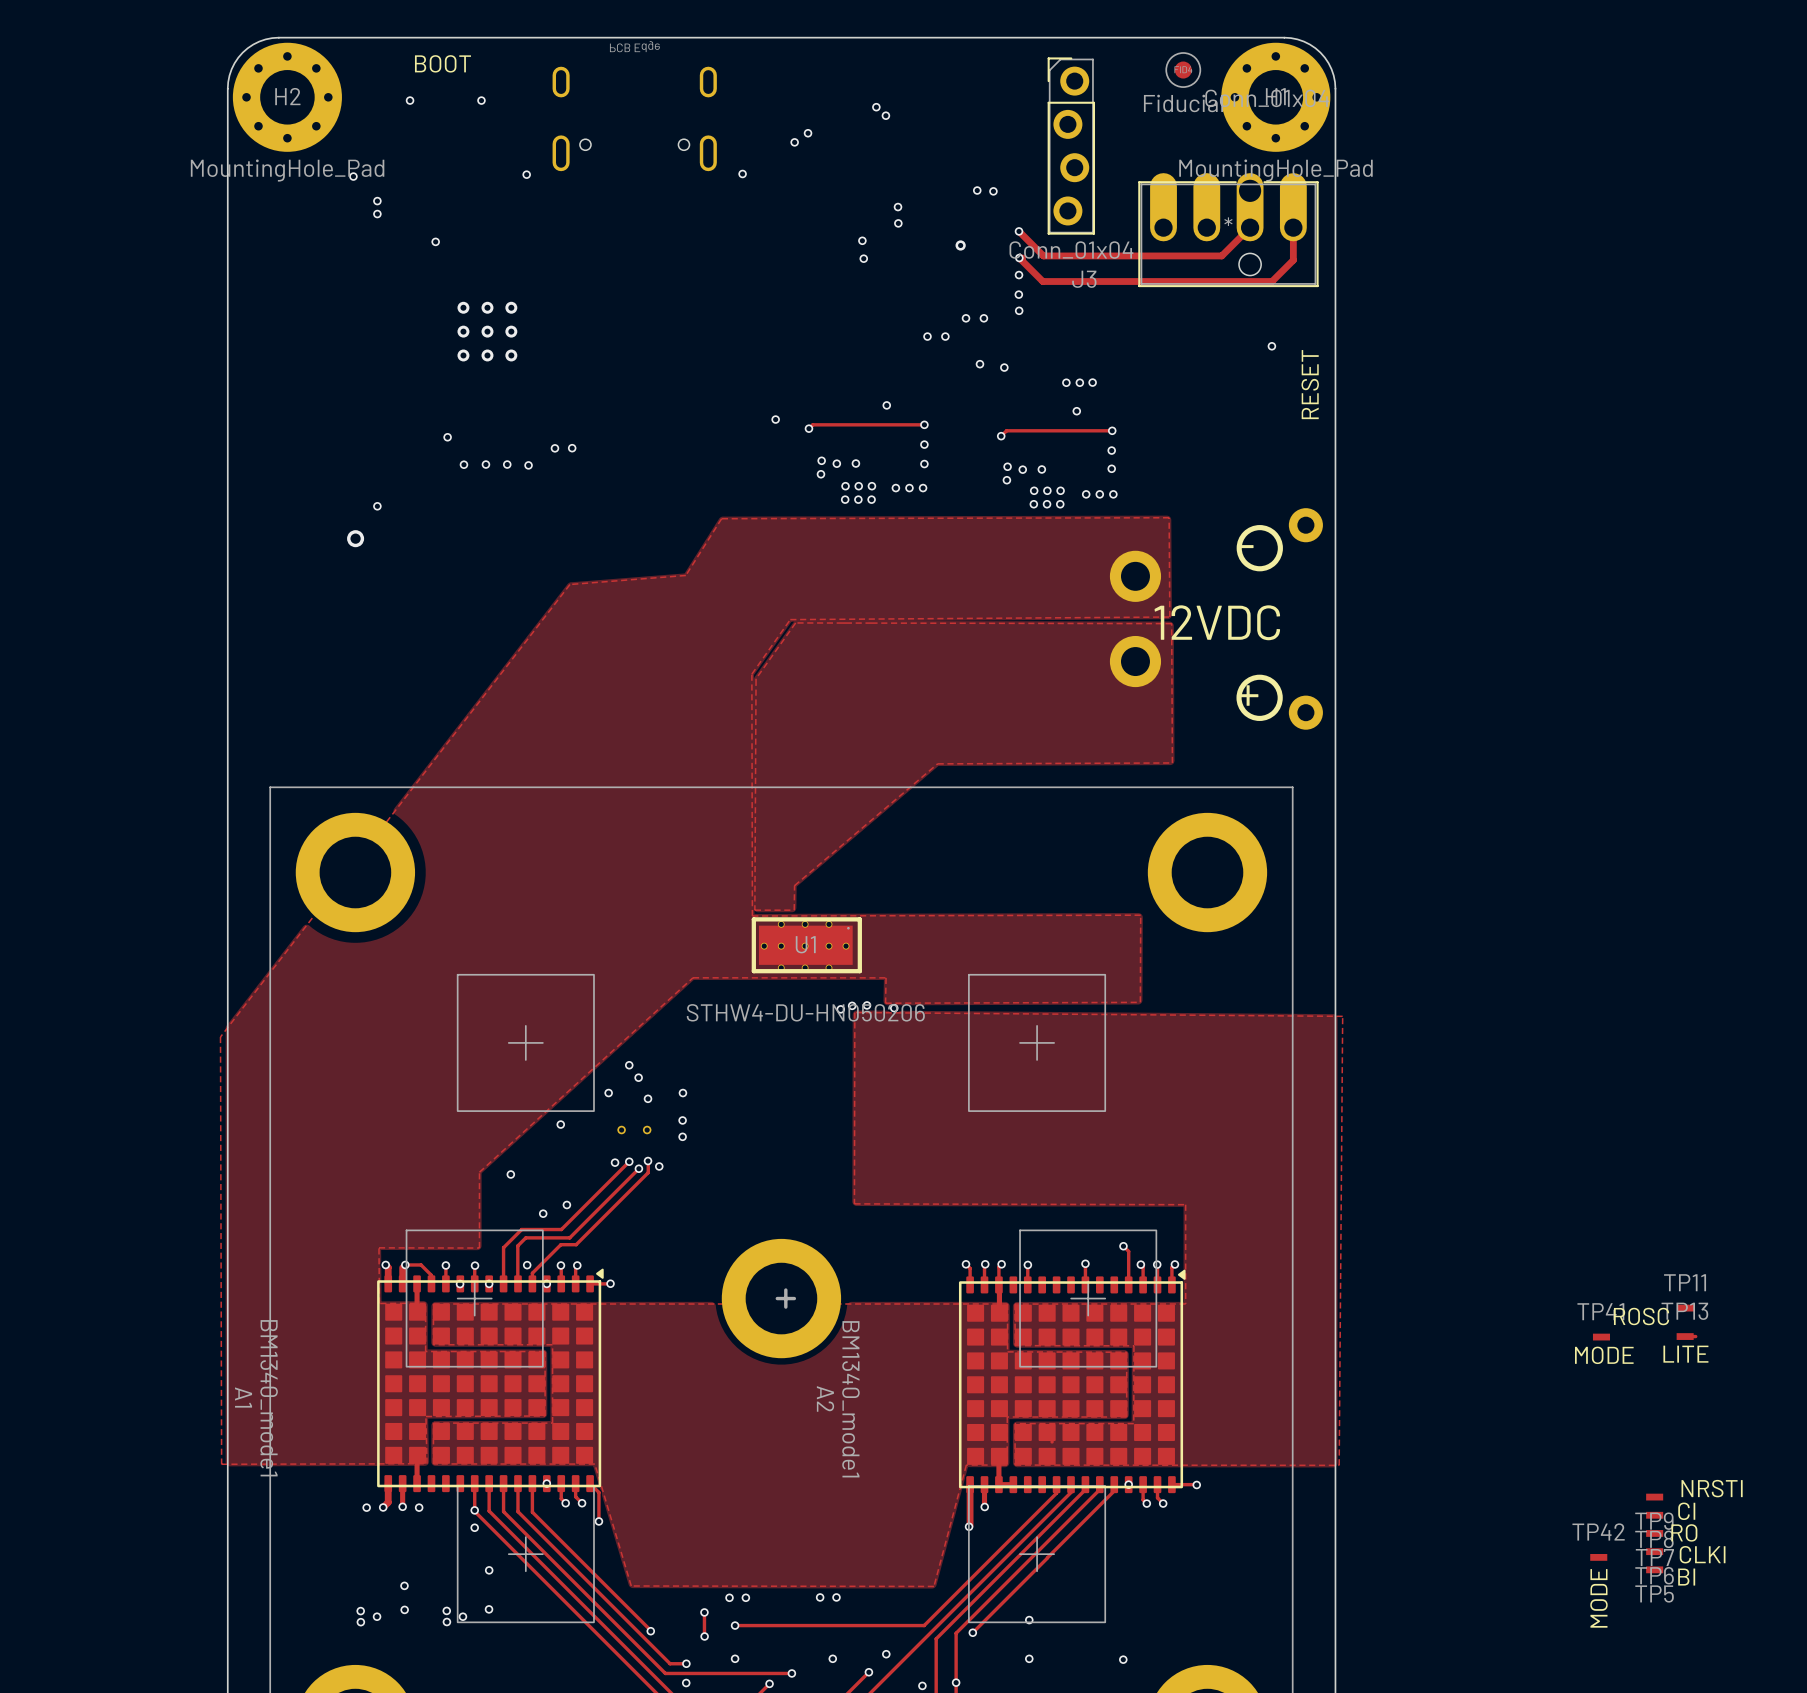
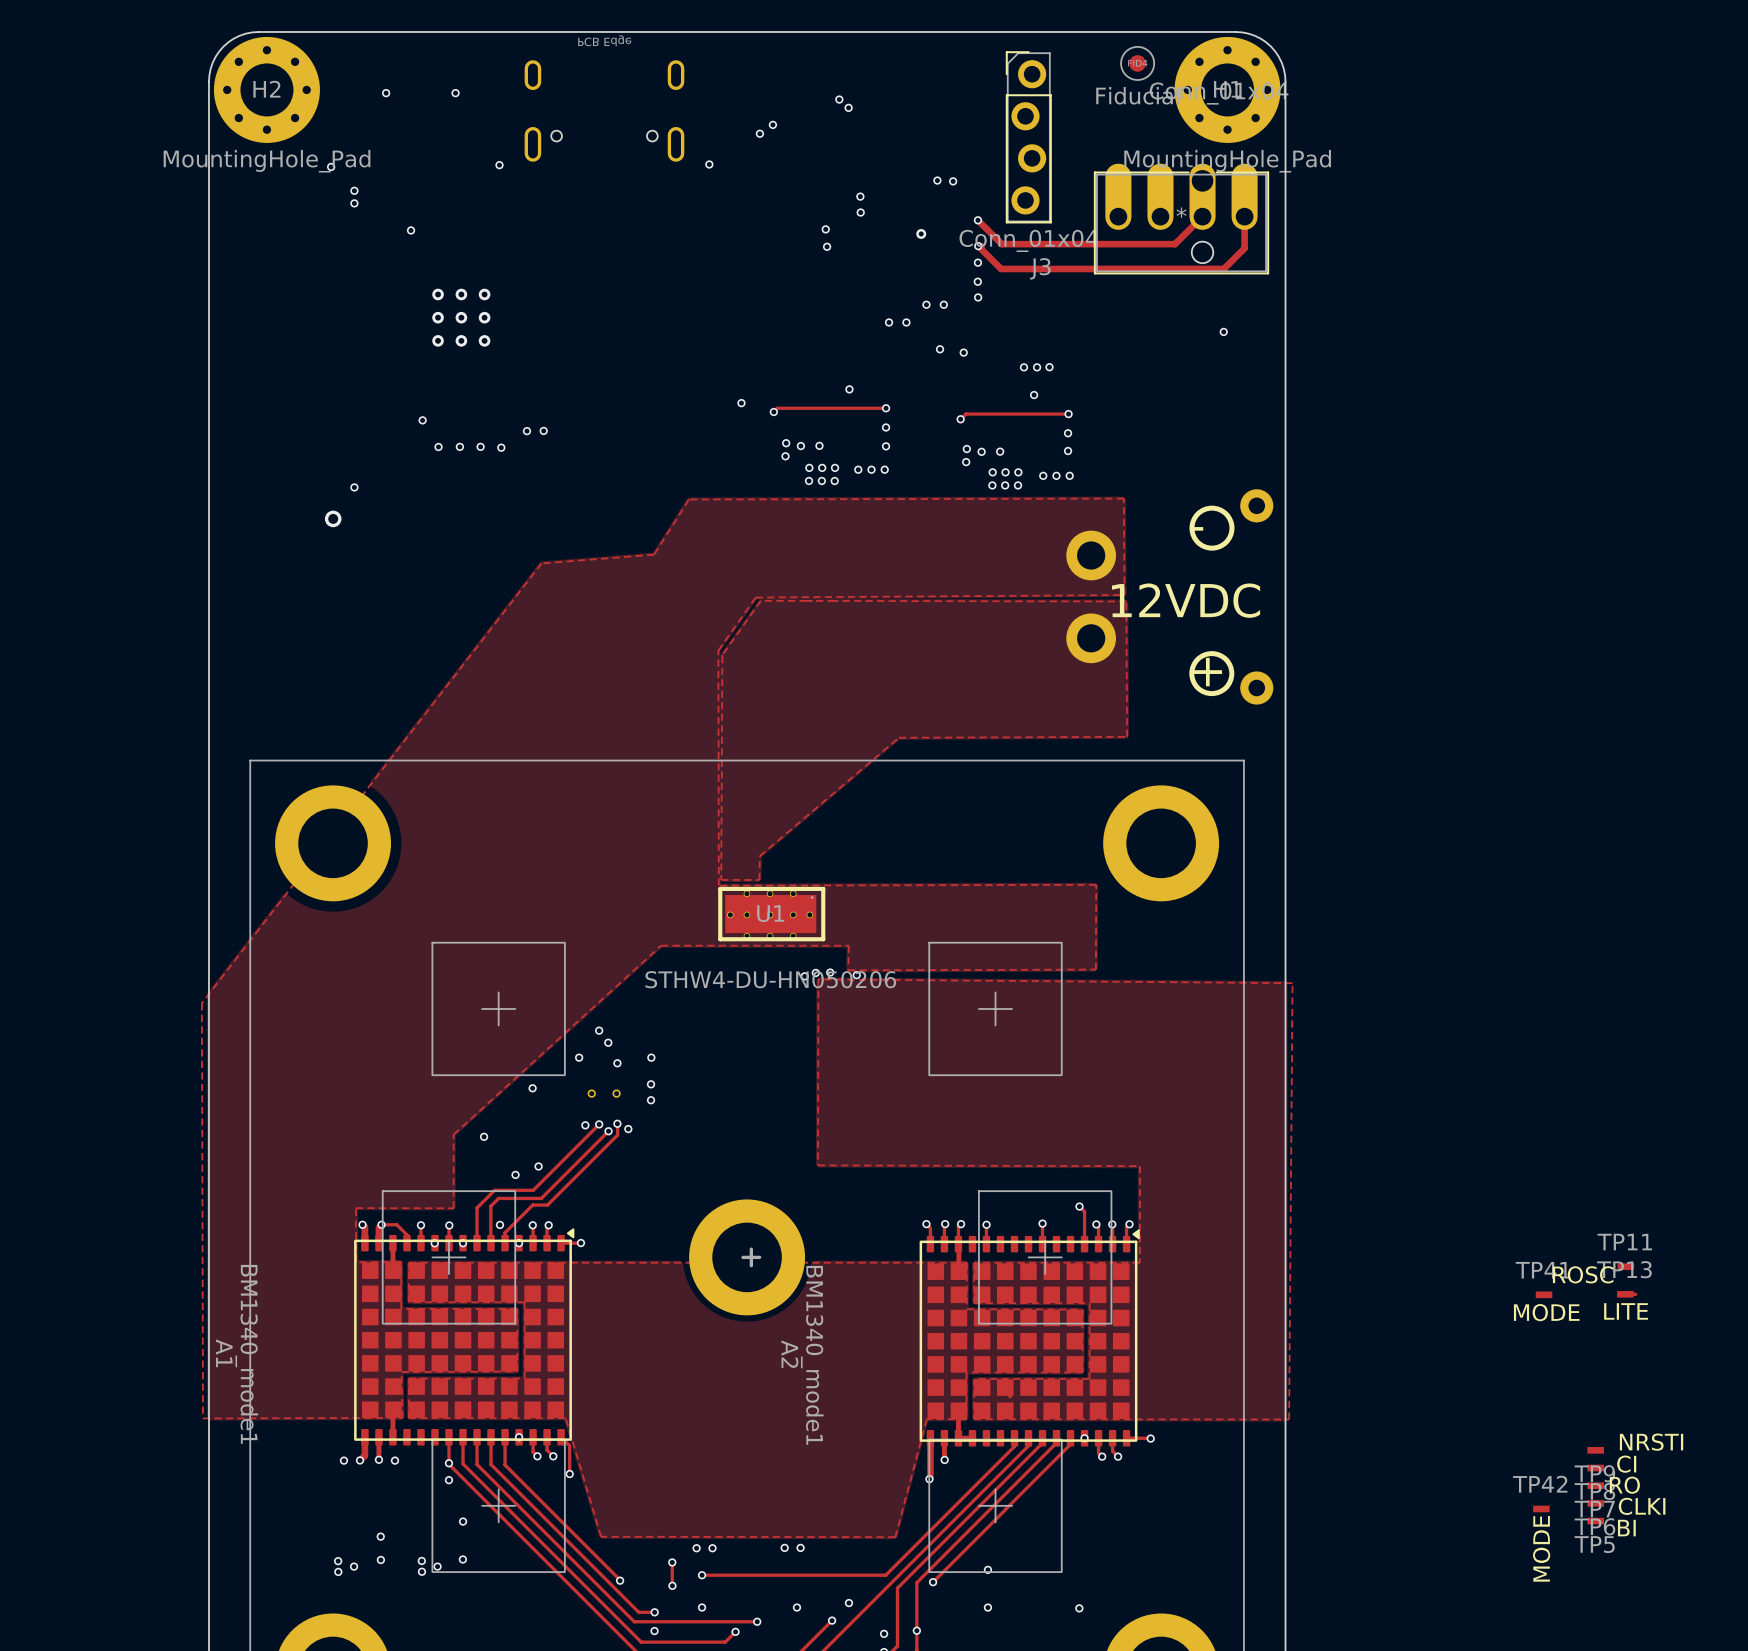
text: BOOT (442, 63) -> none
text: RESET (1310, 384) -> none

